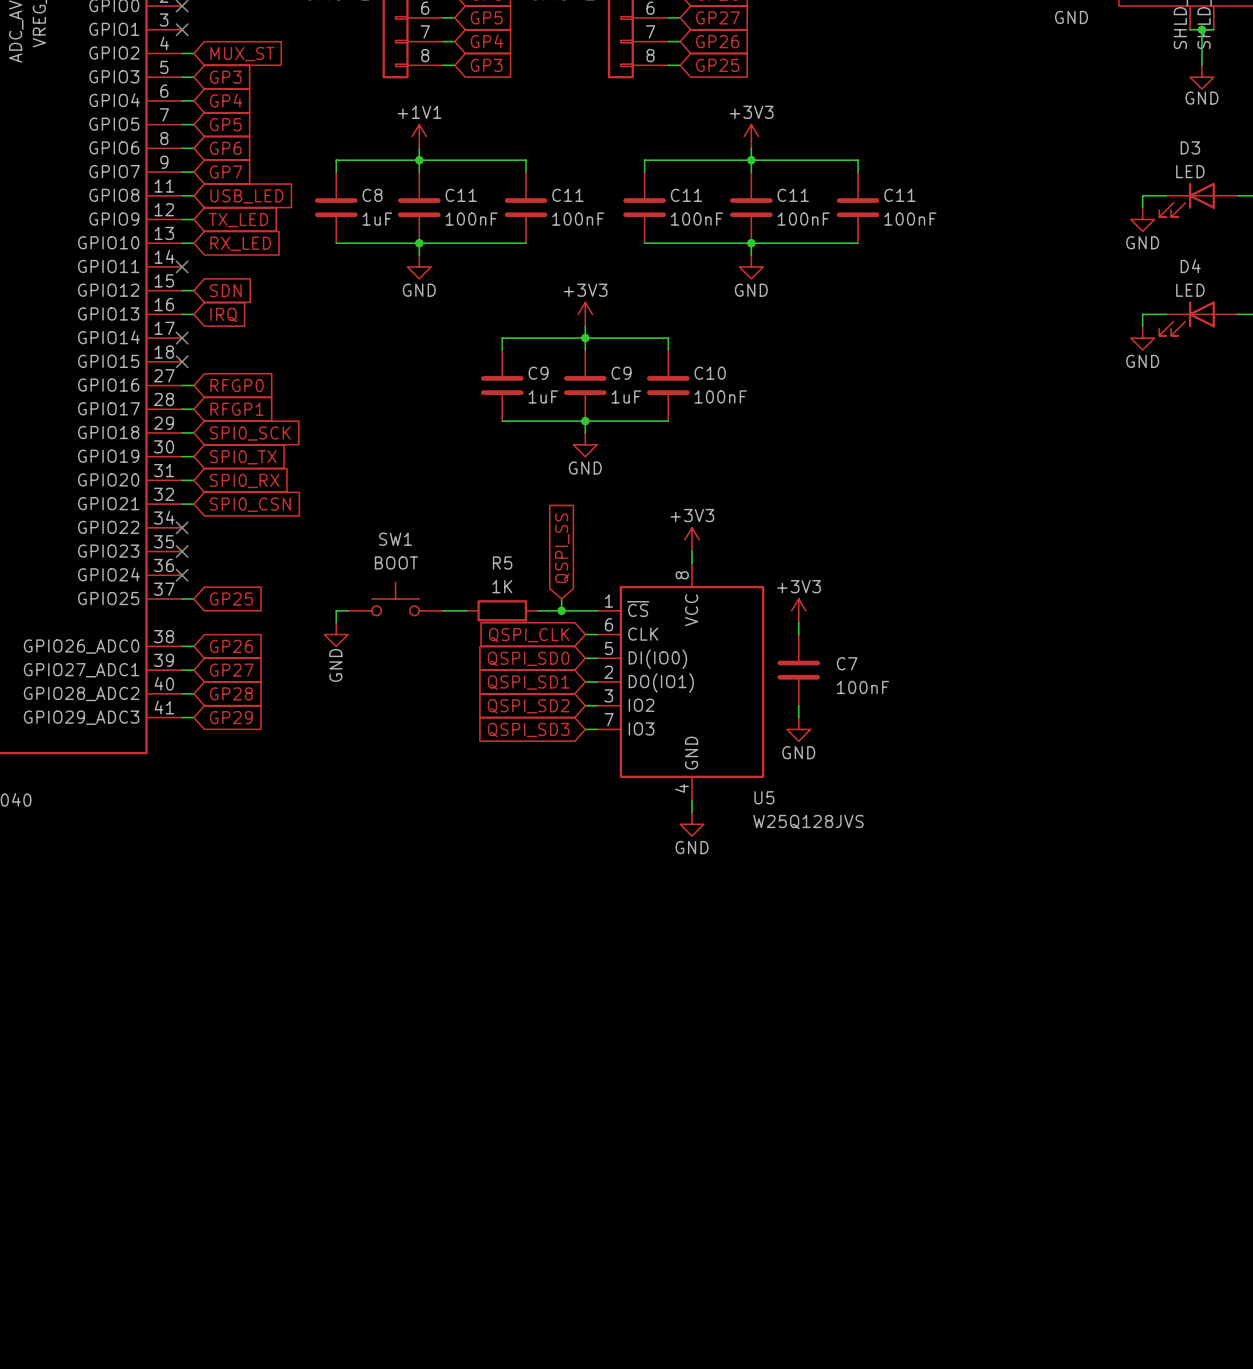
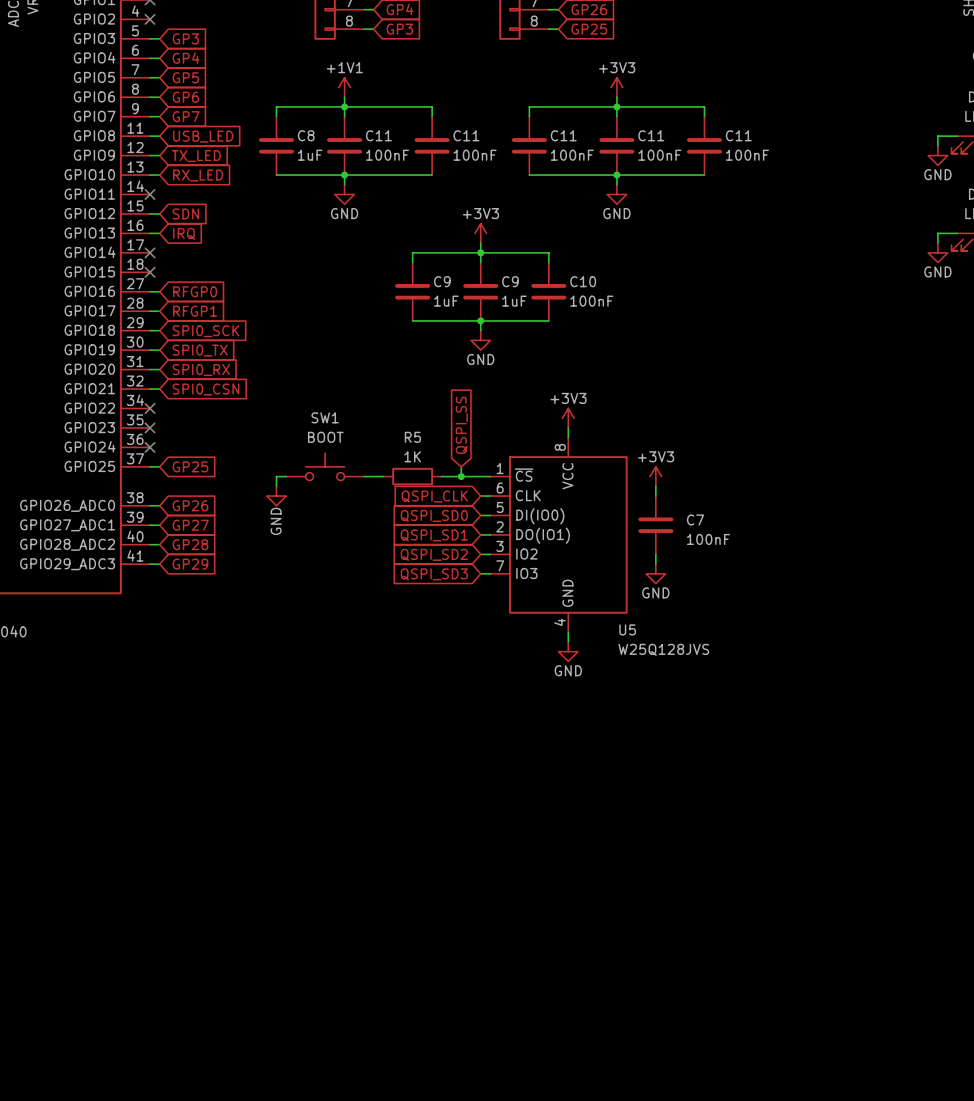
wire: (182, 53) (193, 53) -> none
no-connect mark: none -> (150, 19)
global label: MUX_ST (242, 54) -> none

